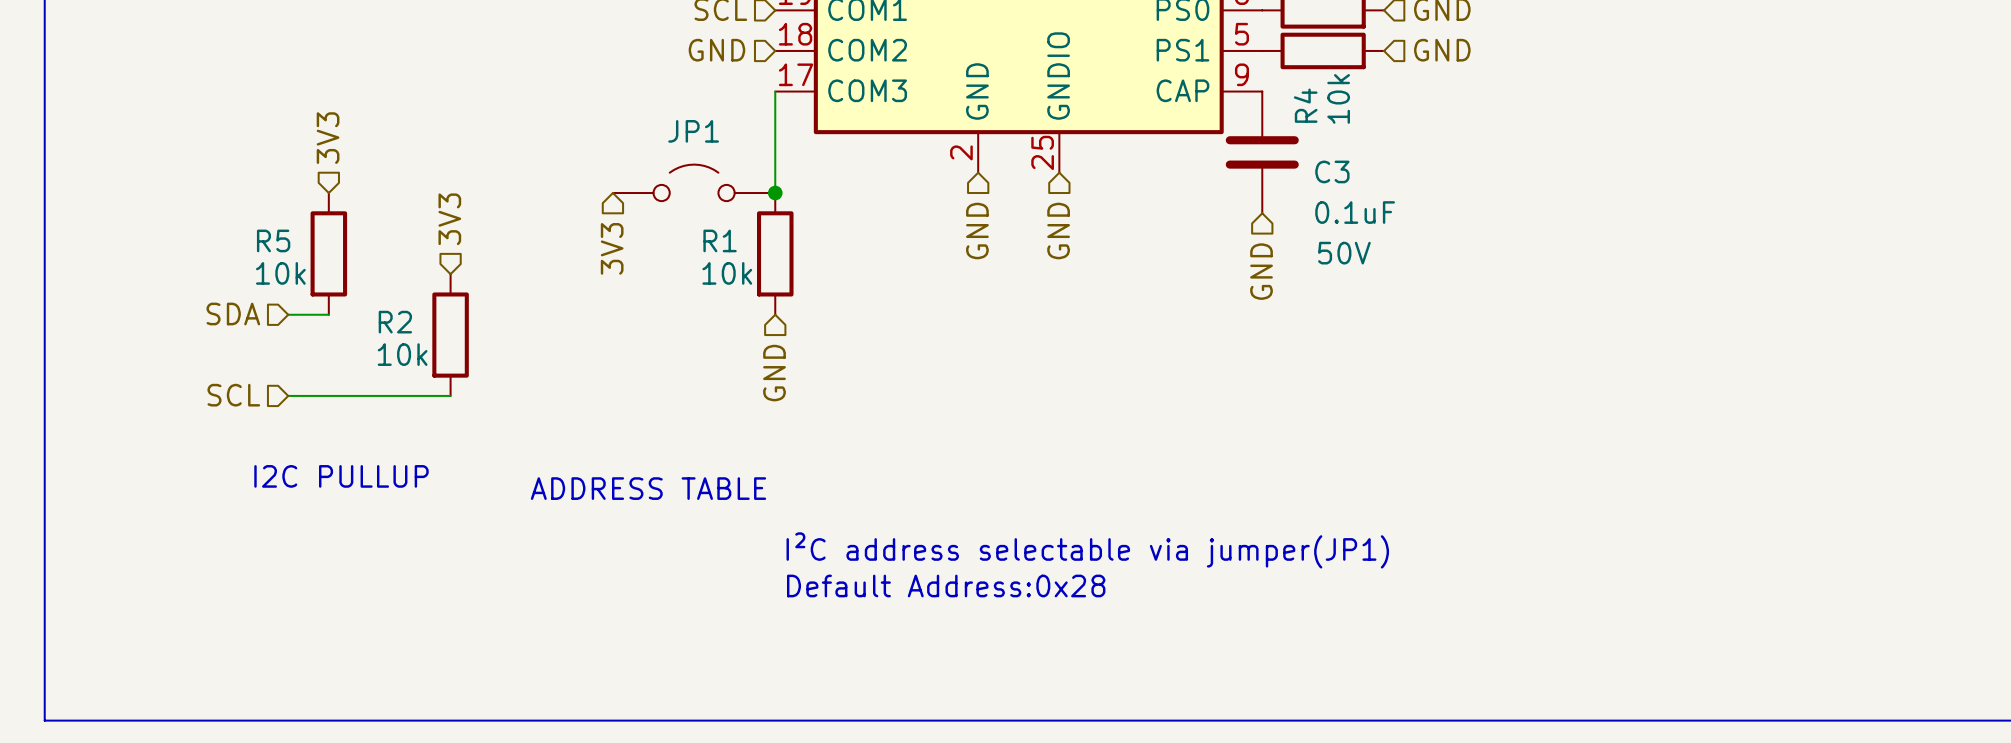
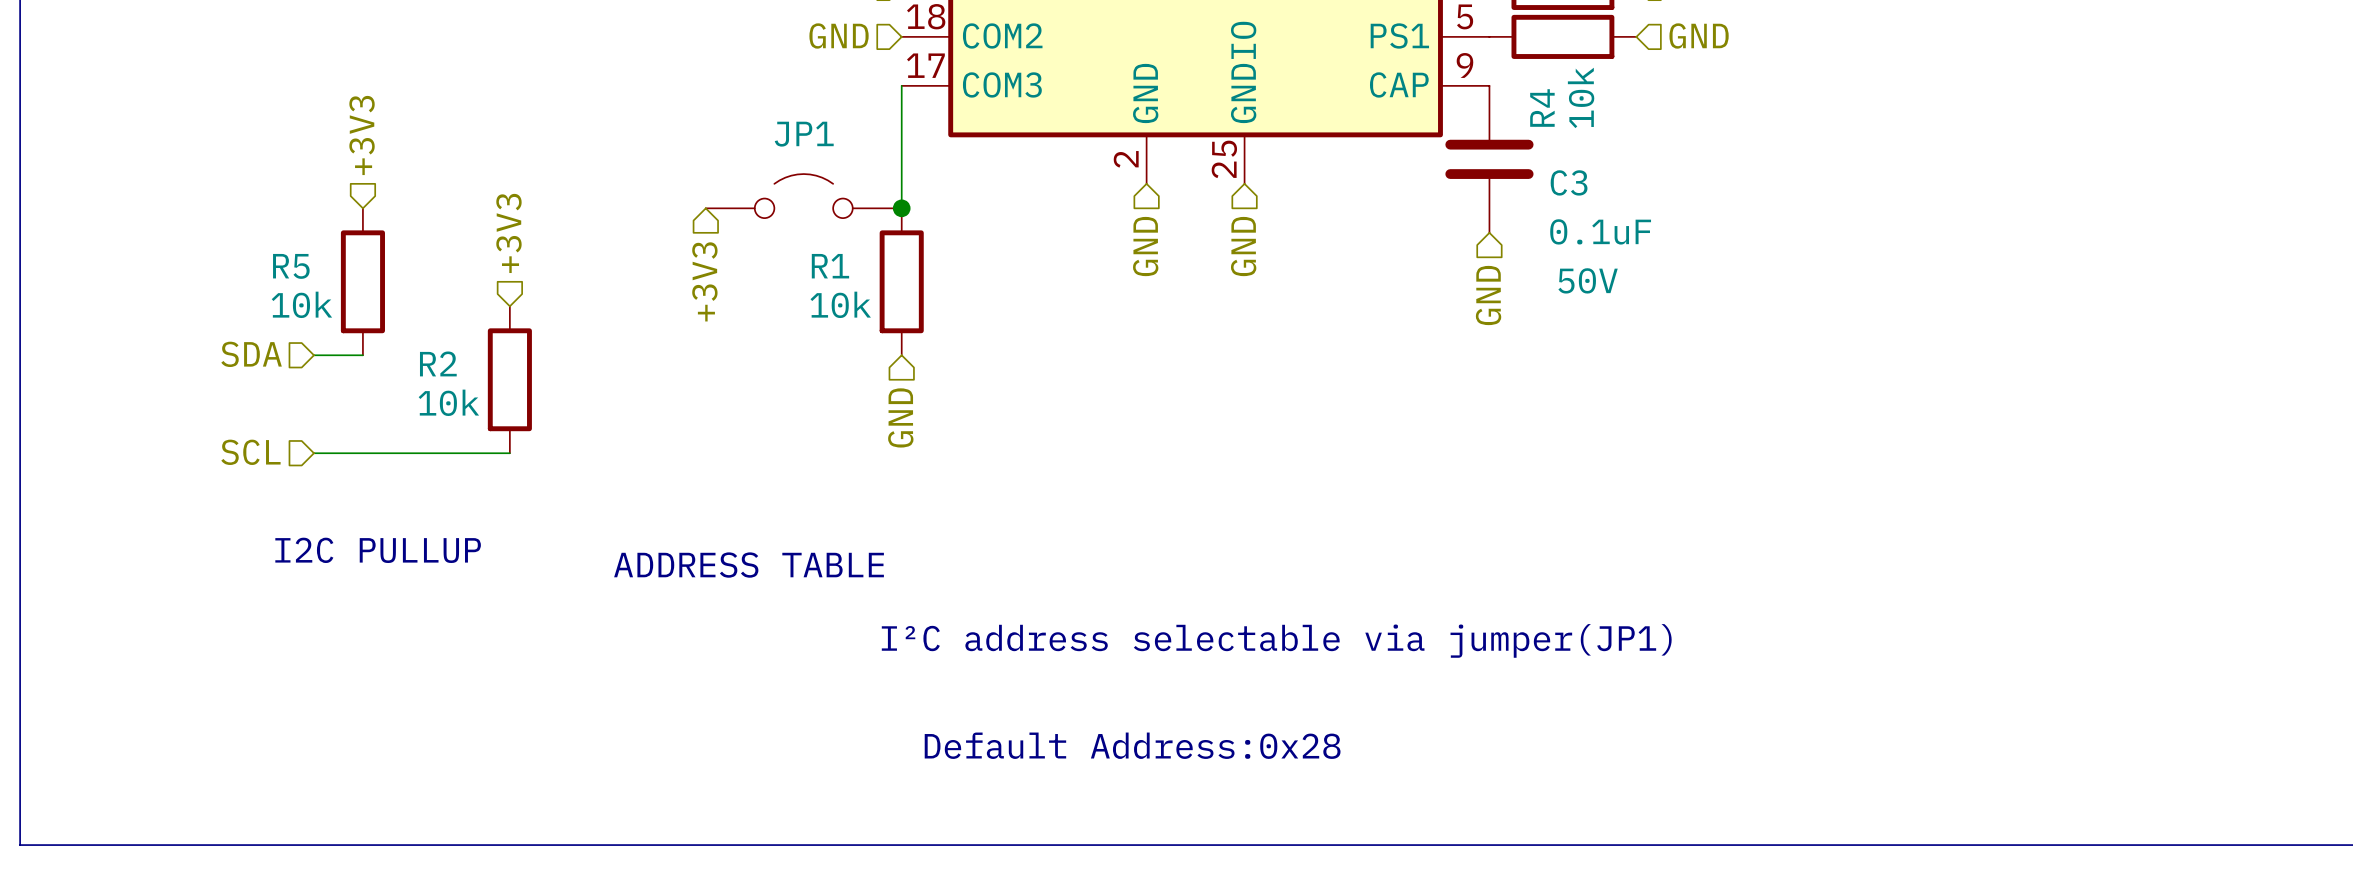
hierarchical label: 3V3 (328, 138) -> +3V3 (362, 135)
hierarchical label: 3V3 (449, 219) -> +3V3 (508, 233)
hierarchical label: 3V3 (612, 248) -> +3V3 (704, 281)
text position: Default Address:0x28 (946, 585) -> Default Address:0x28 (1132, 745)

